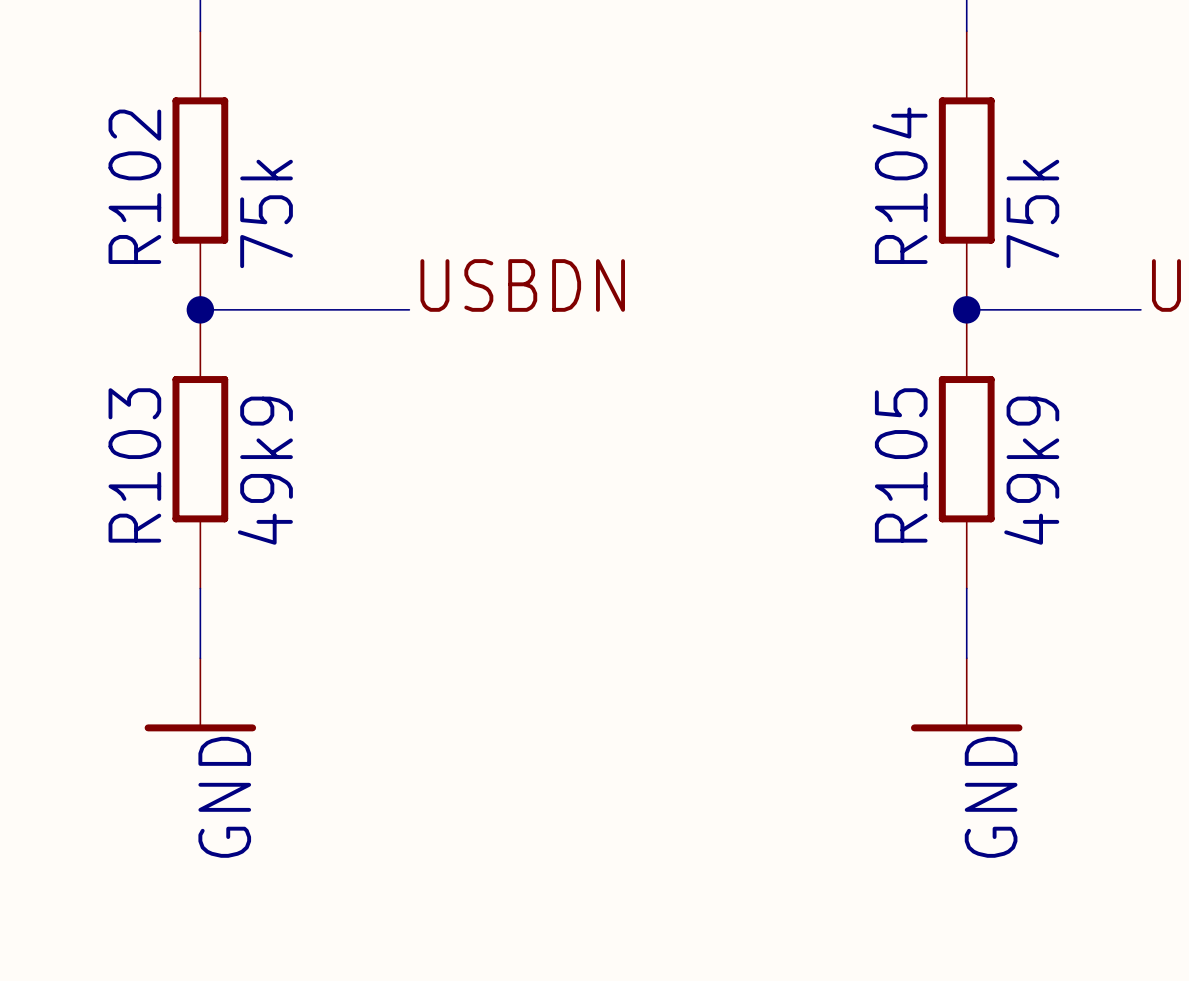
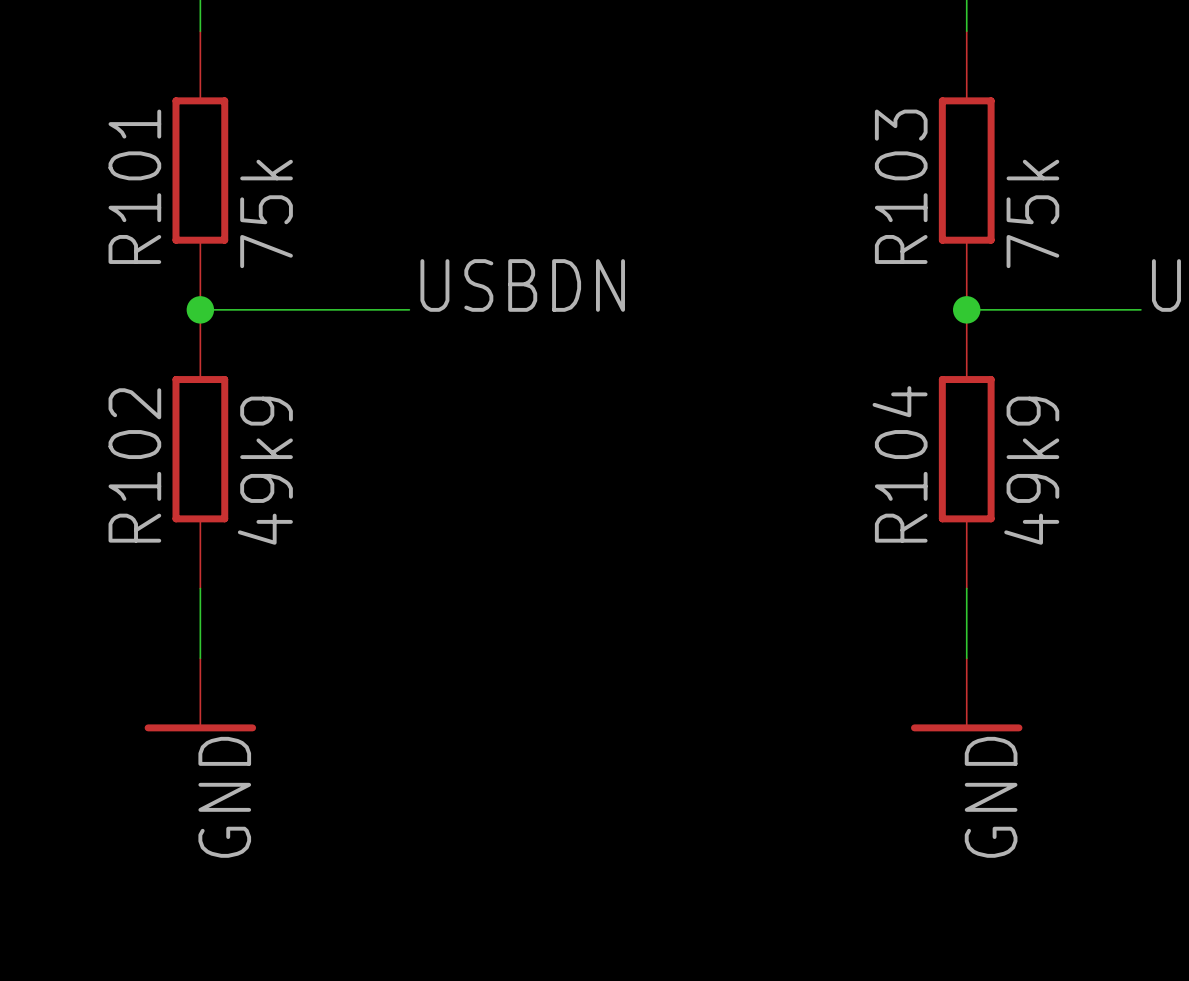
R104 name: R104 (900, 185) -> R103 (901, 186)
R102 name: R102 (134, 186) -> R101 (134, 186)
R103 name: R103 (134, 465) -> R102 (134, 465)
R105 name: R105 (901, 465) -> R104 (900, 464)

